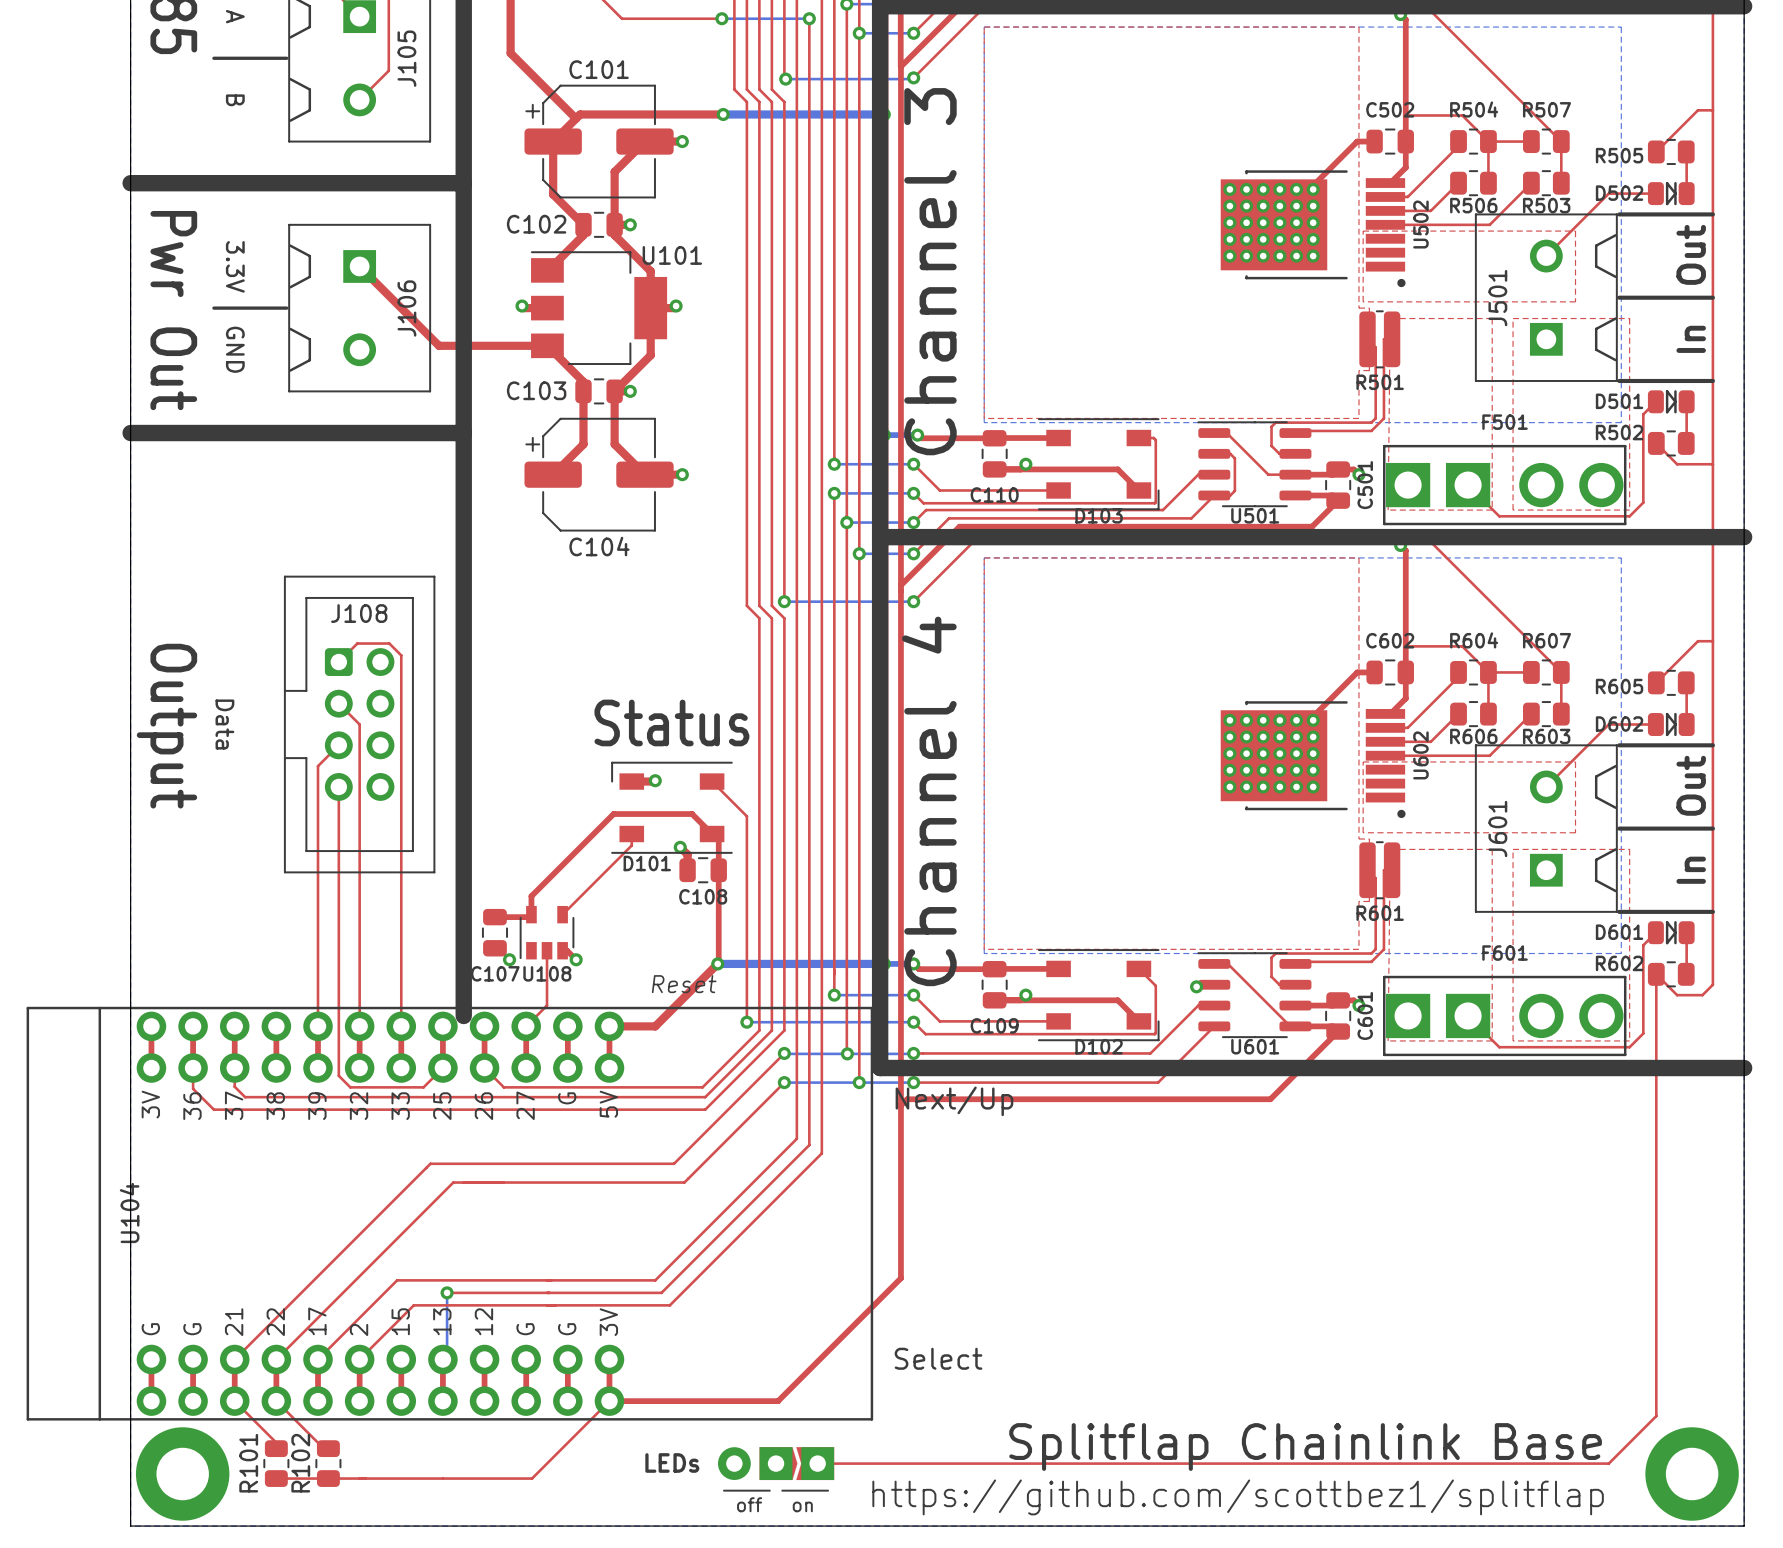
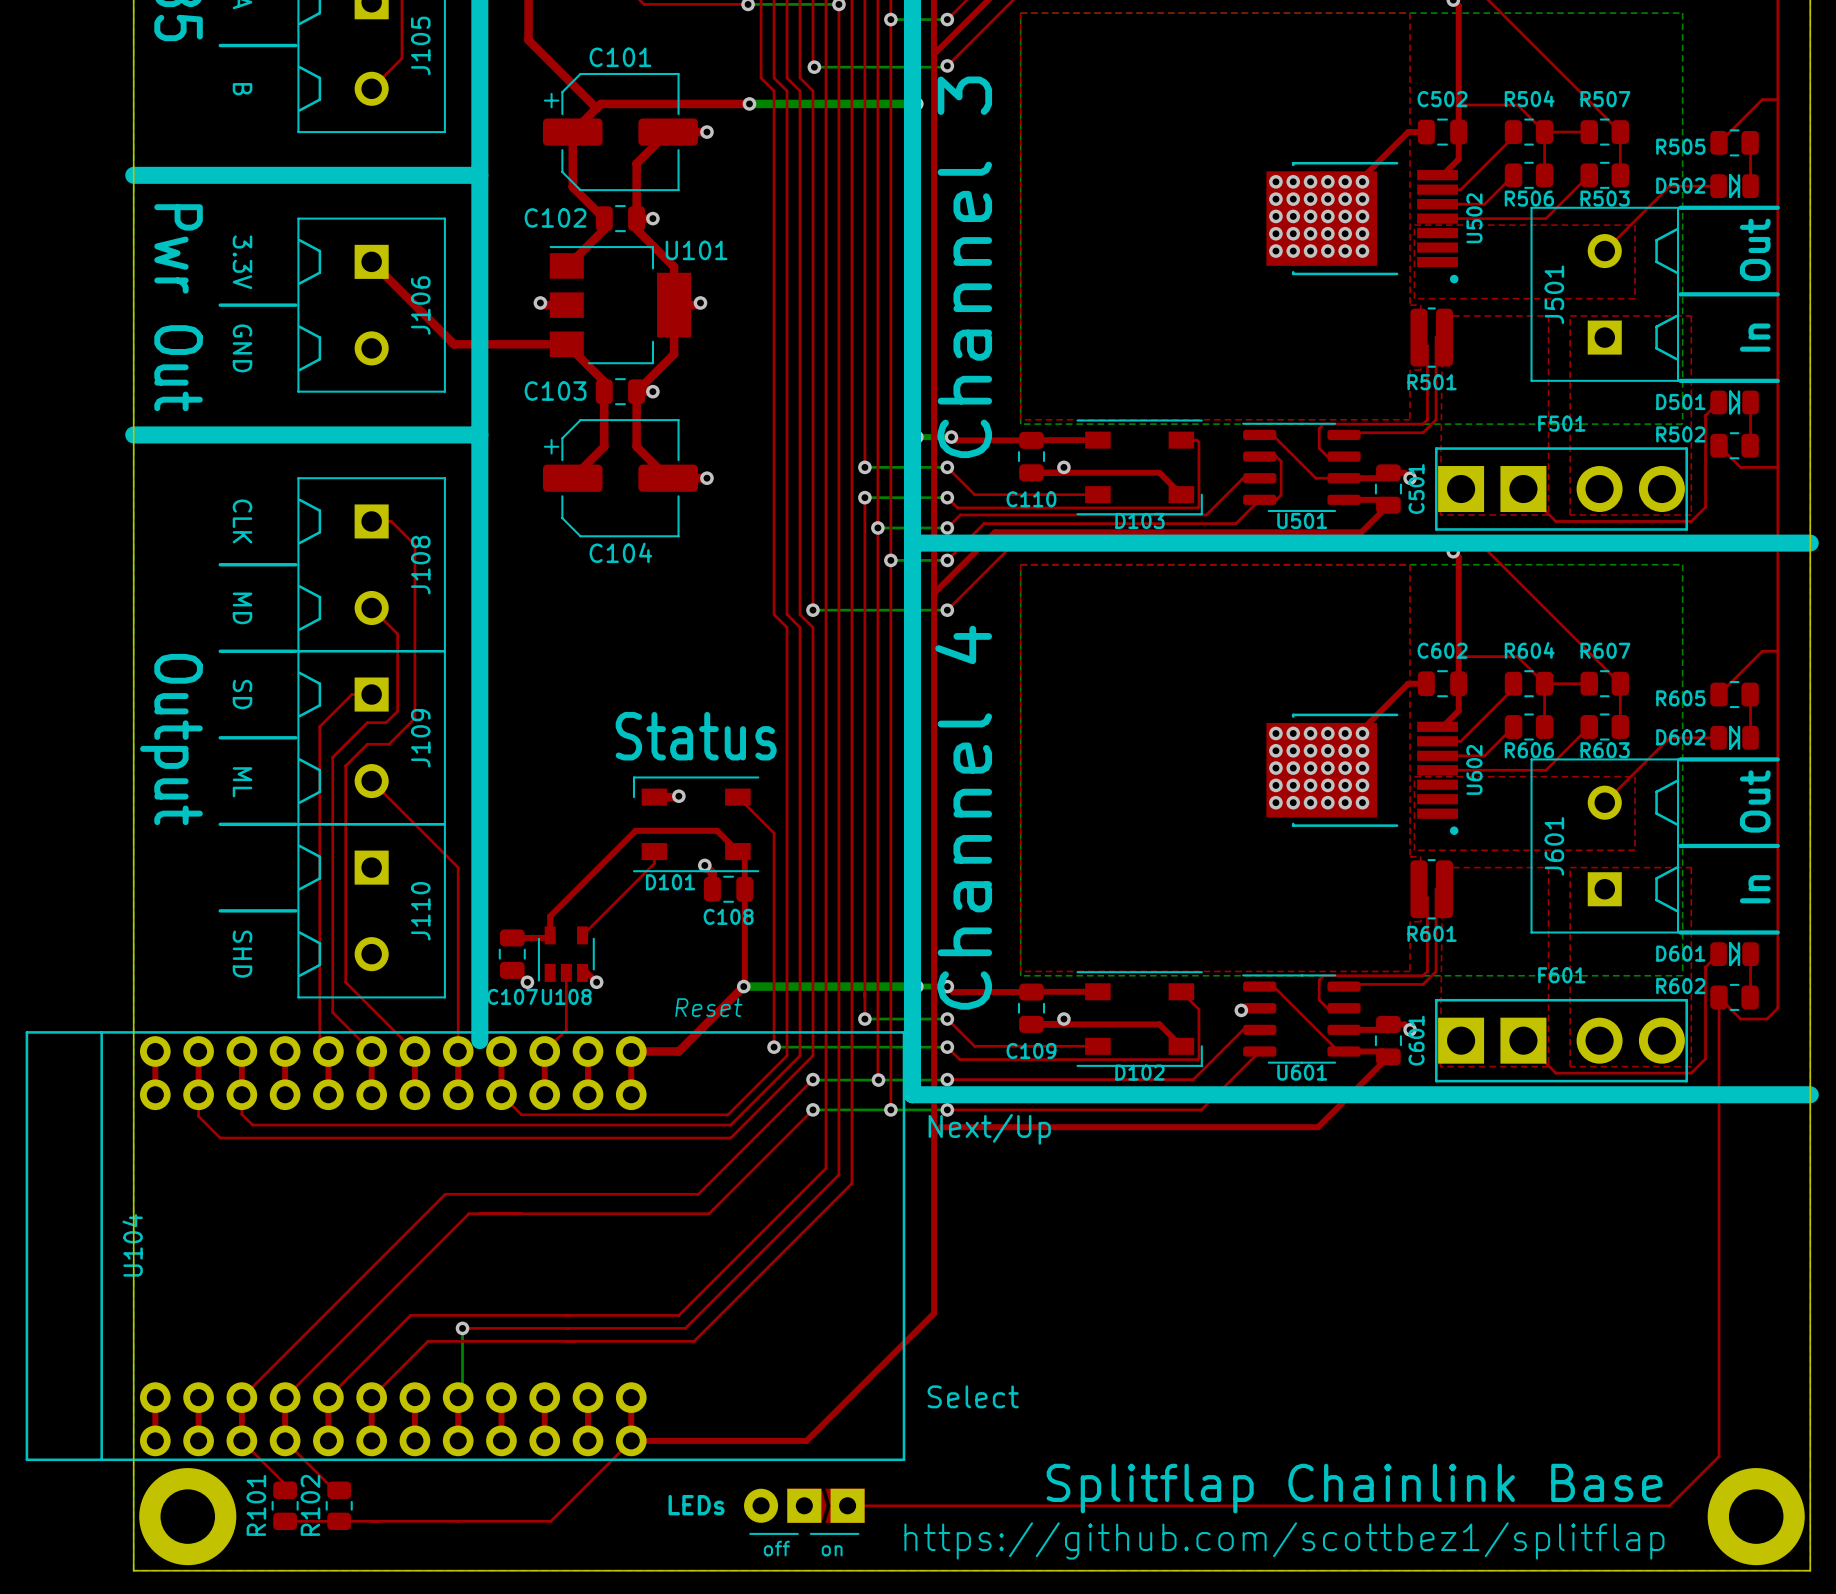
text: none -> CLK (242, 521)
line: none -> (220, 564) (295, 564)
J108 footprint: [283, 575, 436, 874] -> [297, 477, 446, 653]
text: none -> MD (242, 608)
J108 name position: J108 (359, 613) -> J108 (420, 565)
line: none -> (220, 651) (295, 651)
top track: (401, 655) (389, 643) (357, 643) (338, 662) -> (414, 666) (414, 544) (391, 521) (371, 521)
text: none -> SD (242, 694)
top track: (338, 703) (359, 724) (359, 1026) -> (371, 608) (397, 633) (397, 711) (386, 722) (367, 722) (332, 757) (332, 1012) (371, 1051)
top track: (401, 705) (401, 1026) -> (414, 718) (388, 744) (367, 744) (345, 765) (345, 982) (414, 1051)
line: none -> (220, 737) (295, 737)
text: Data (224, 724) -> none
J109: none -> (371, 737)
top track: (338, 745) (318, 766) (318, 1026) -> (371, 694) (351, 694) (319, 726) (319, 1042) (328, 1051)
top track: none -> (371, 781) (458, 867) (458, 1051)
text: none -> ML (242, 782)
top track: (338, 786) (338, 1075) (350, 1087) (423, 1087) (442, 1068) -> none
line: none -> (220, 824) (295, 824)
line: none -> (220, 910) (295, 910)
J110: none -> (371, 910)
text: none -> SHD (242, 954)
U104 footprint: [26, 1006, 874, 1421] -> [25, 1031, 906, 1462]

